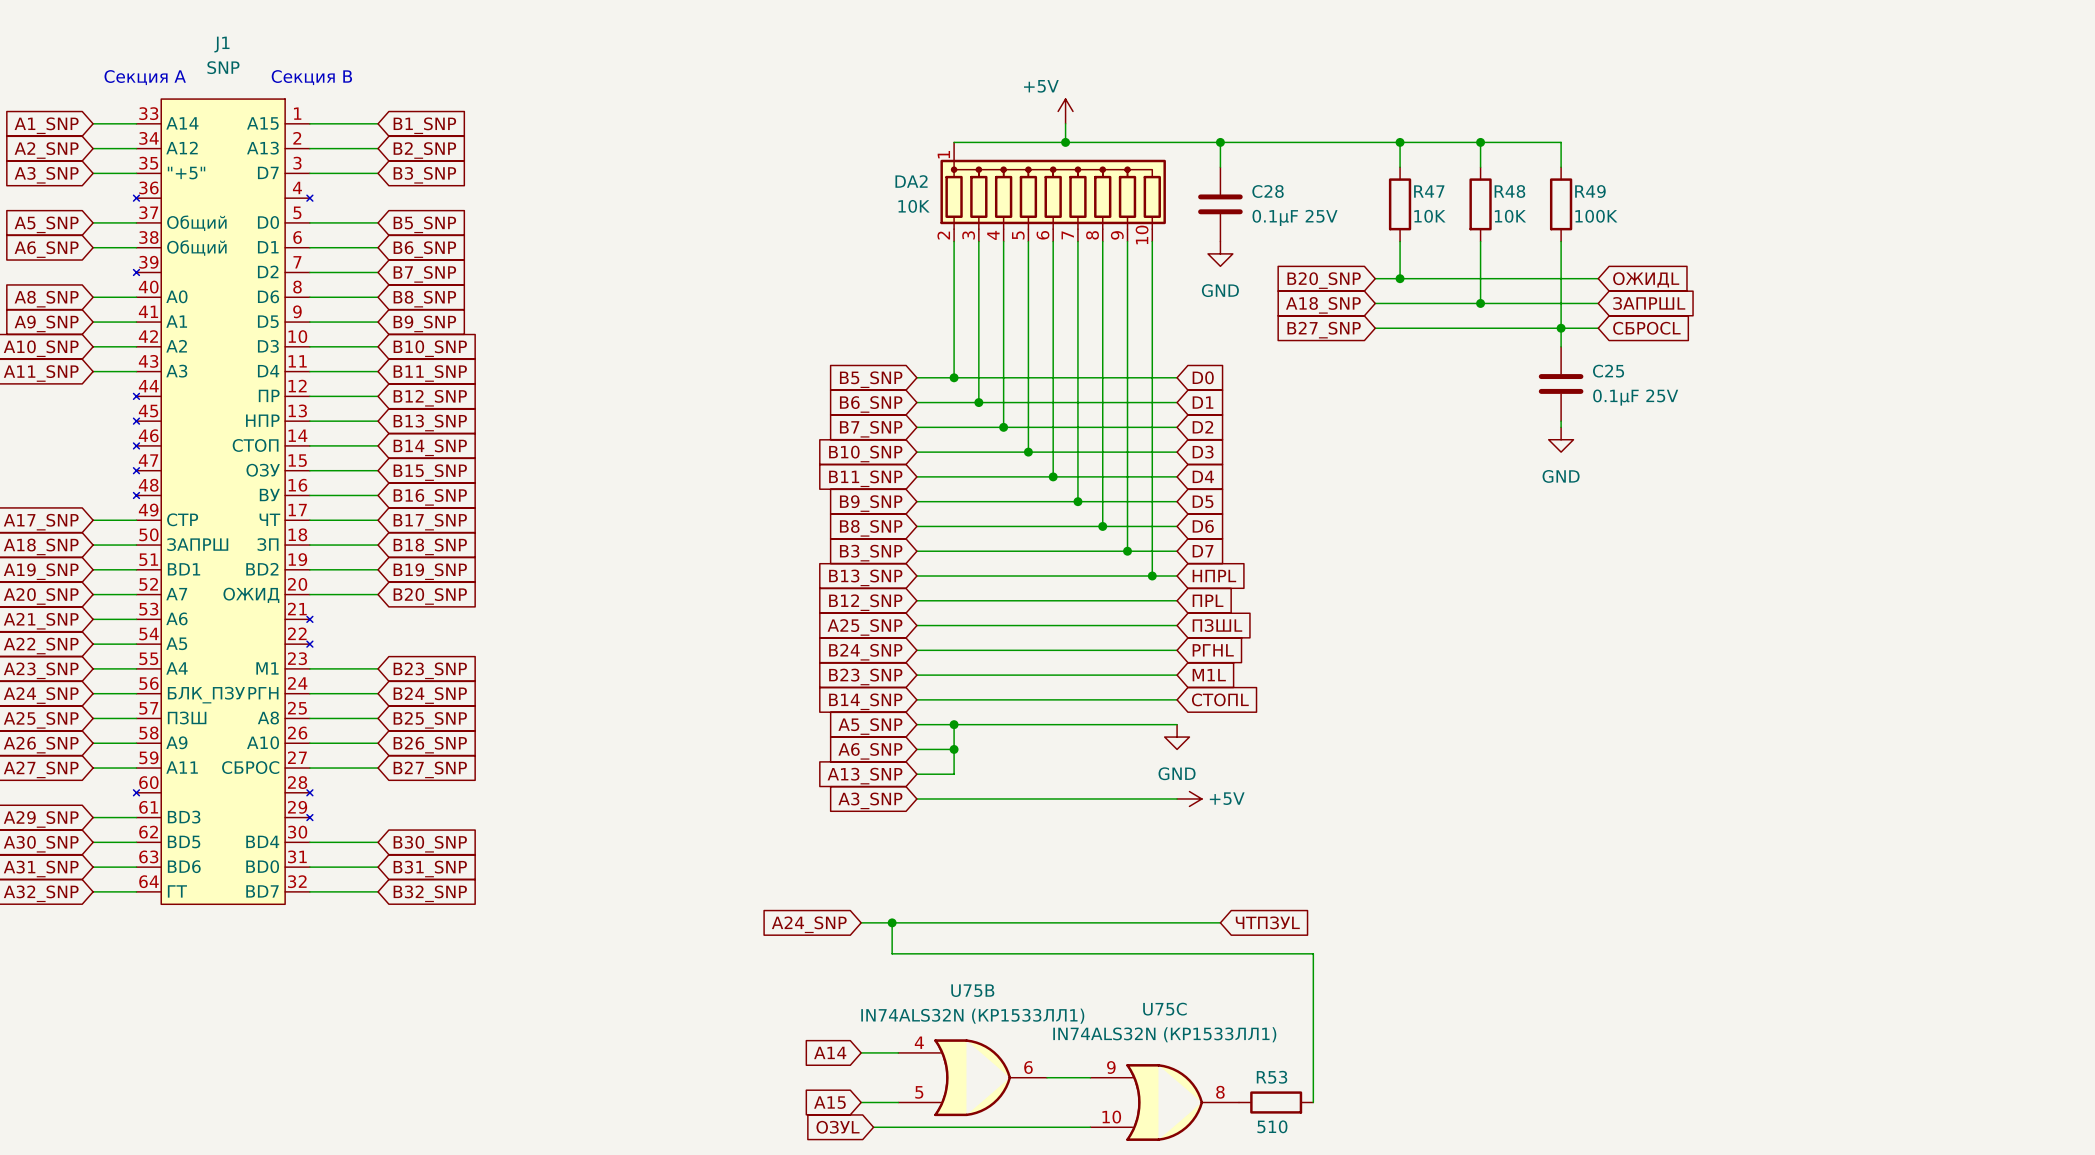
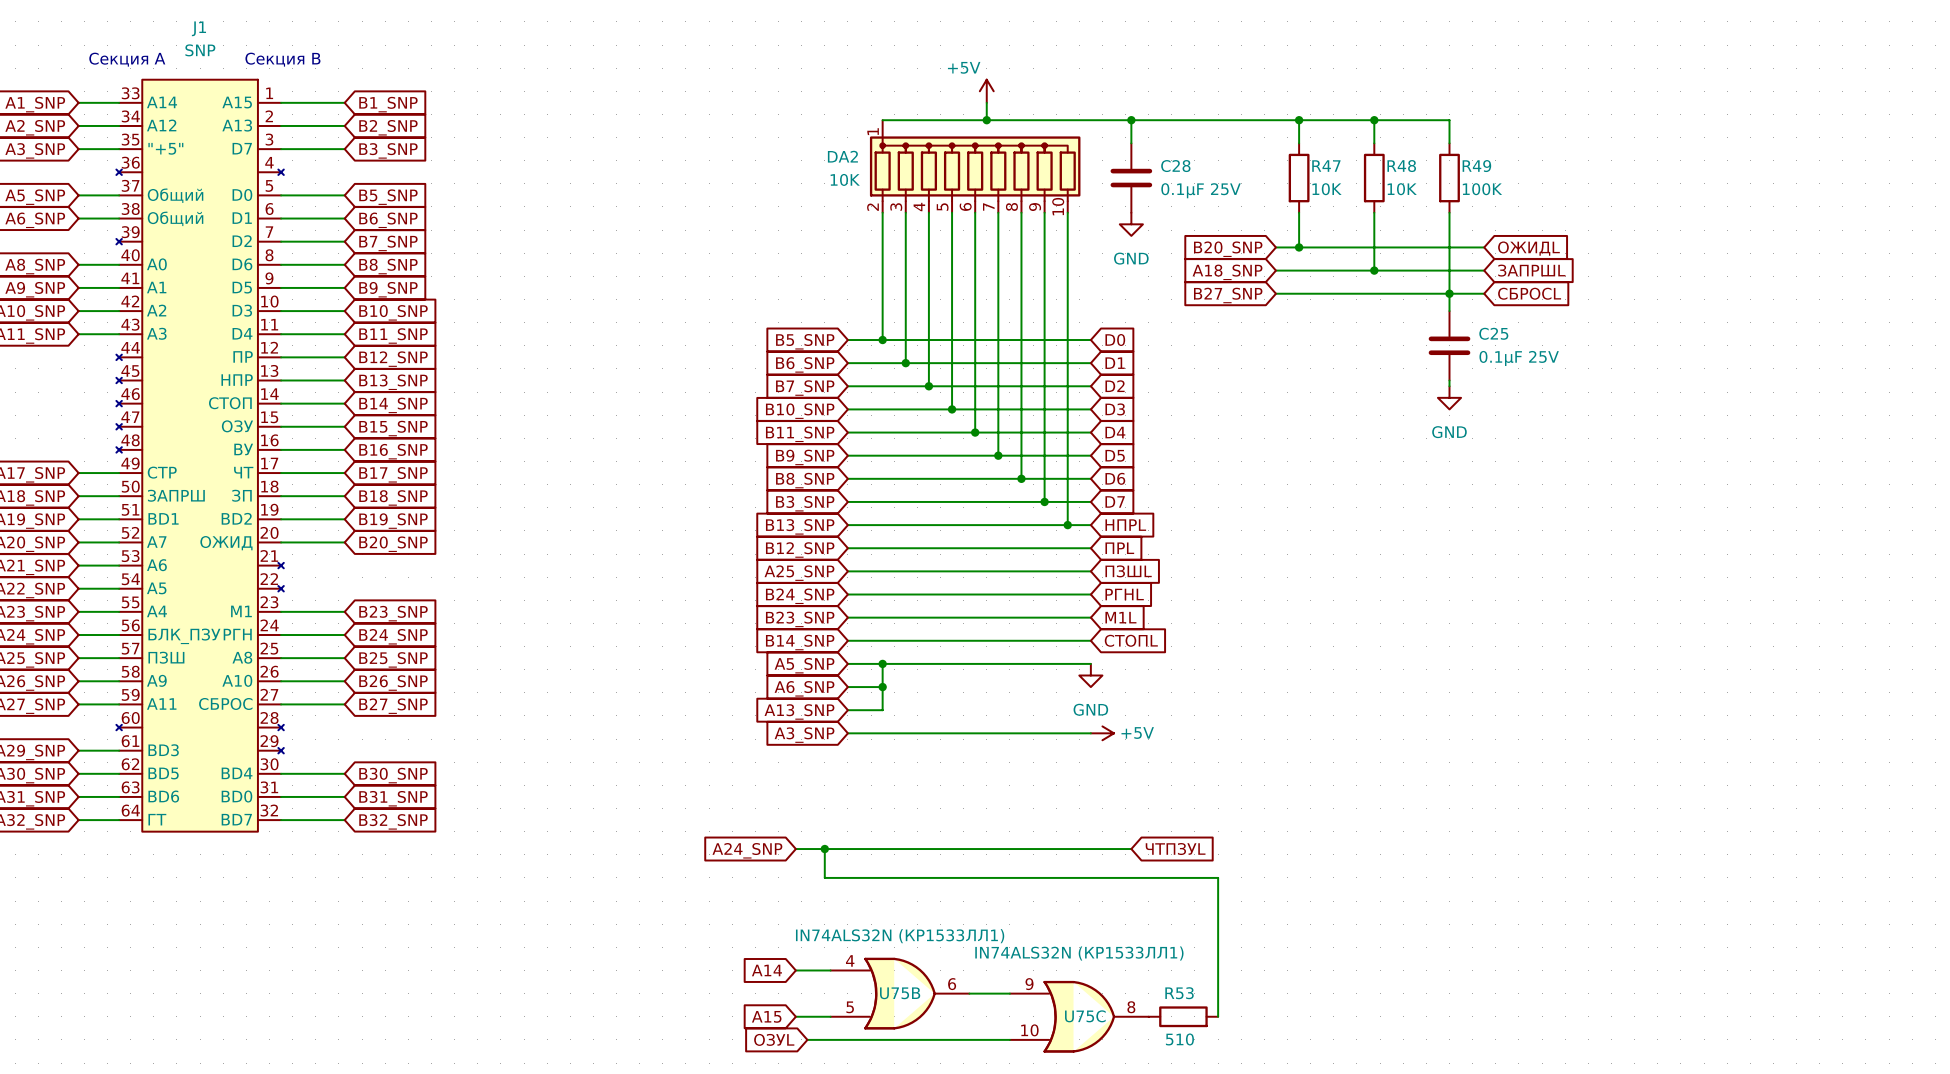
U75B name position: U75B (972, 990) -> U75B (900, 993)
U75C name position: U75C (1164, 1009) -> U75C (1085, 1016)

